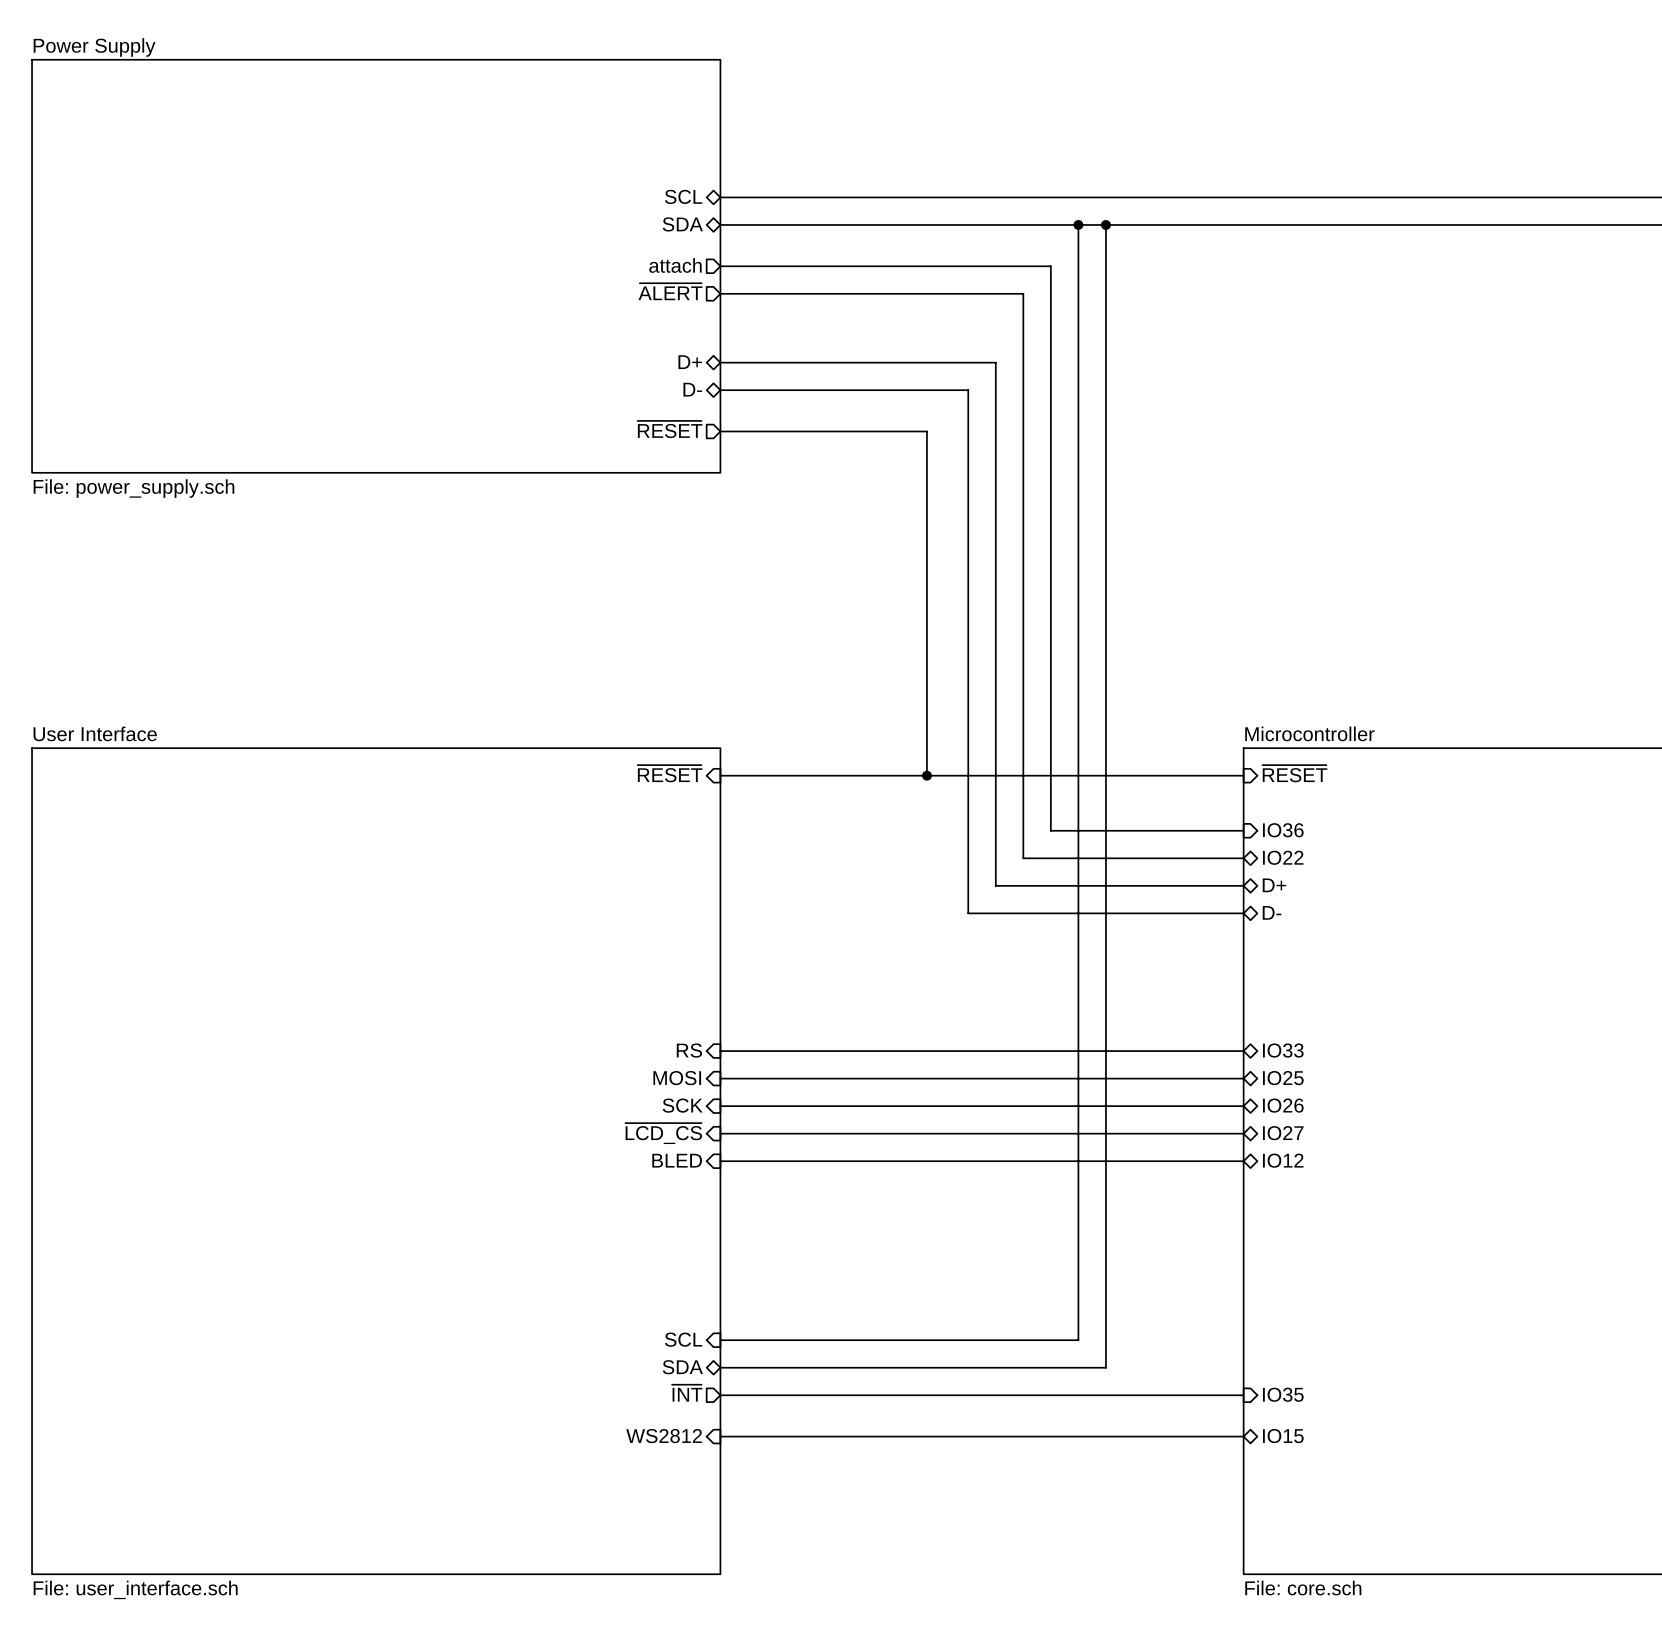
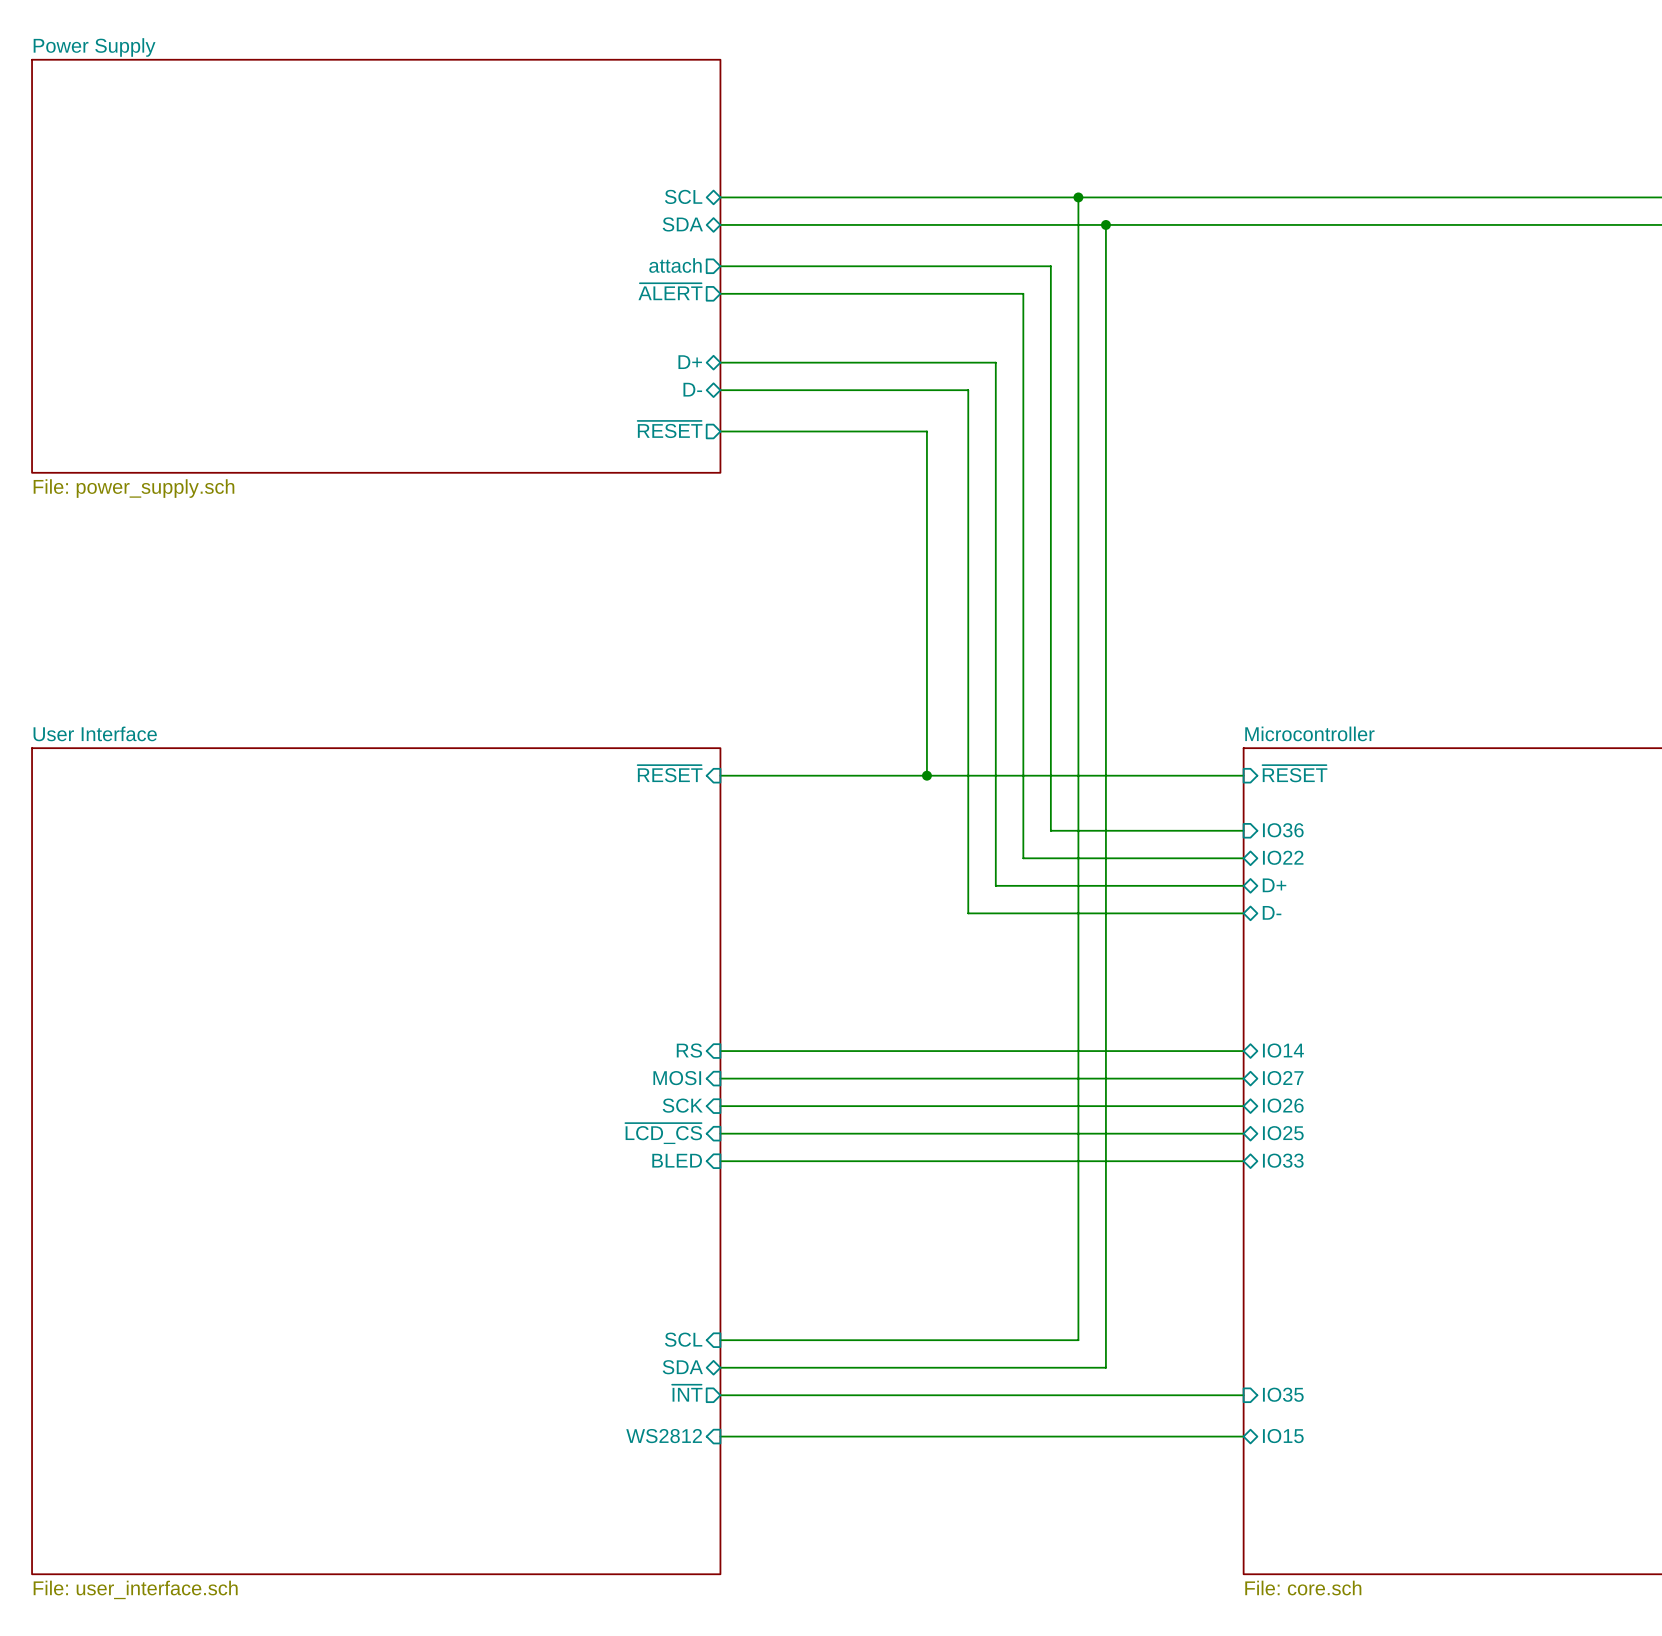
wire: none -> (1078, 197) (1078, 224)
junction position: (1078, 224) -> (1078, 197)
sheet pin: IO33 (1283, 1050) -> IO14 (1283, 1050)
sheet pin: IO25 (1283, 1078) -> IO27 (1283, 1078)
sheet pin: IO27 (1283, 1133) -> IO25 (1283, 1133)
sheet pin: IO12 (1283, 1160) -> IO33 (1283, 1160)

